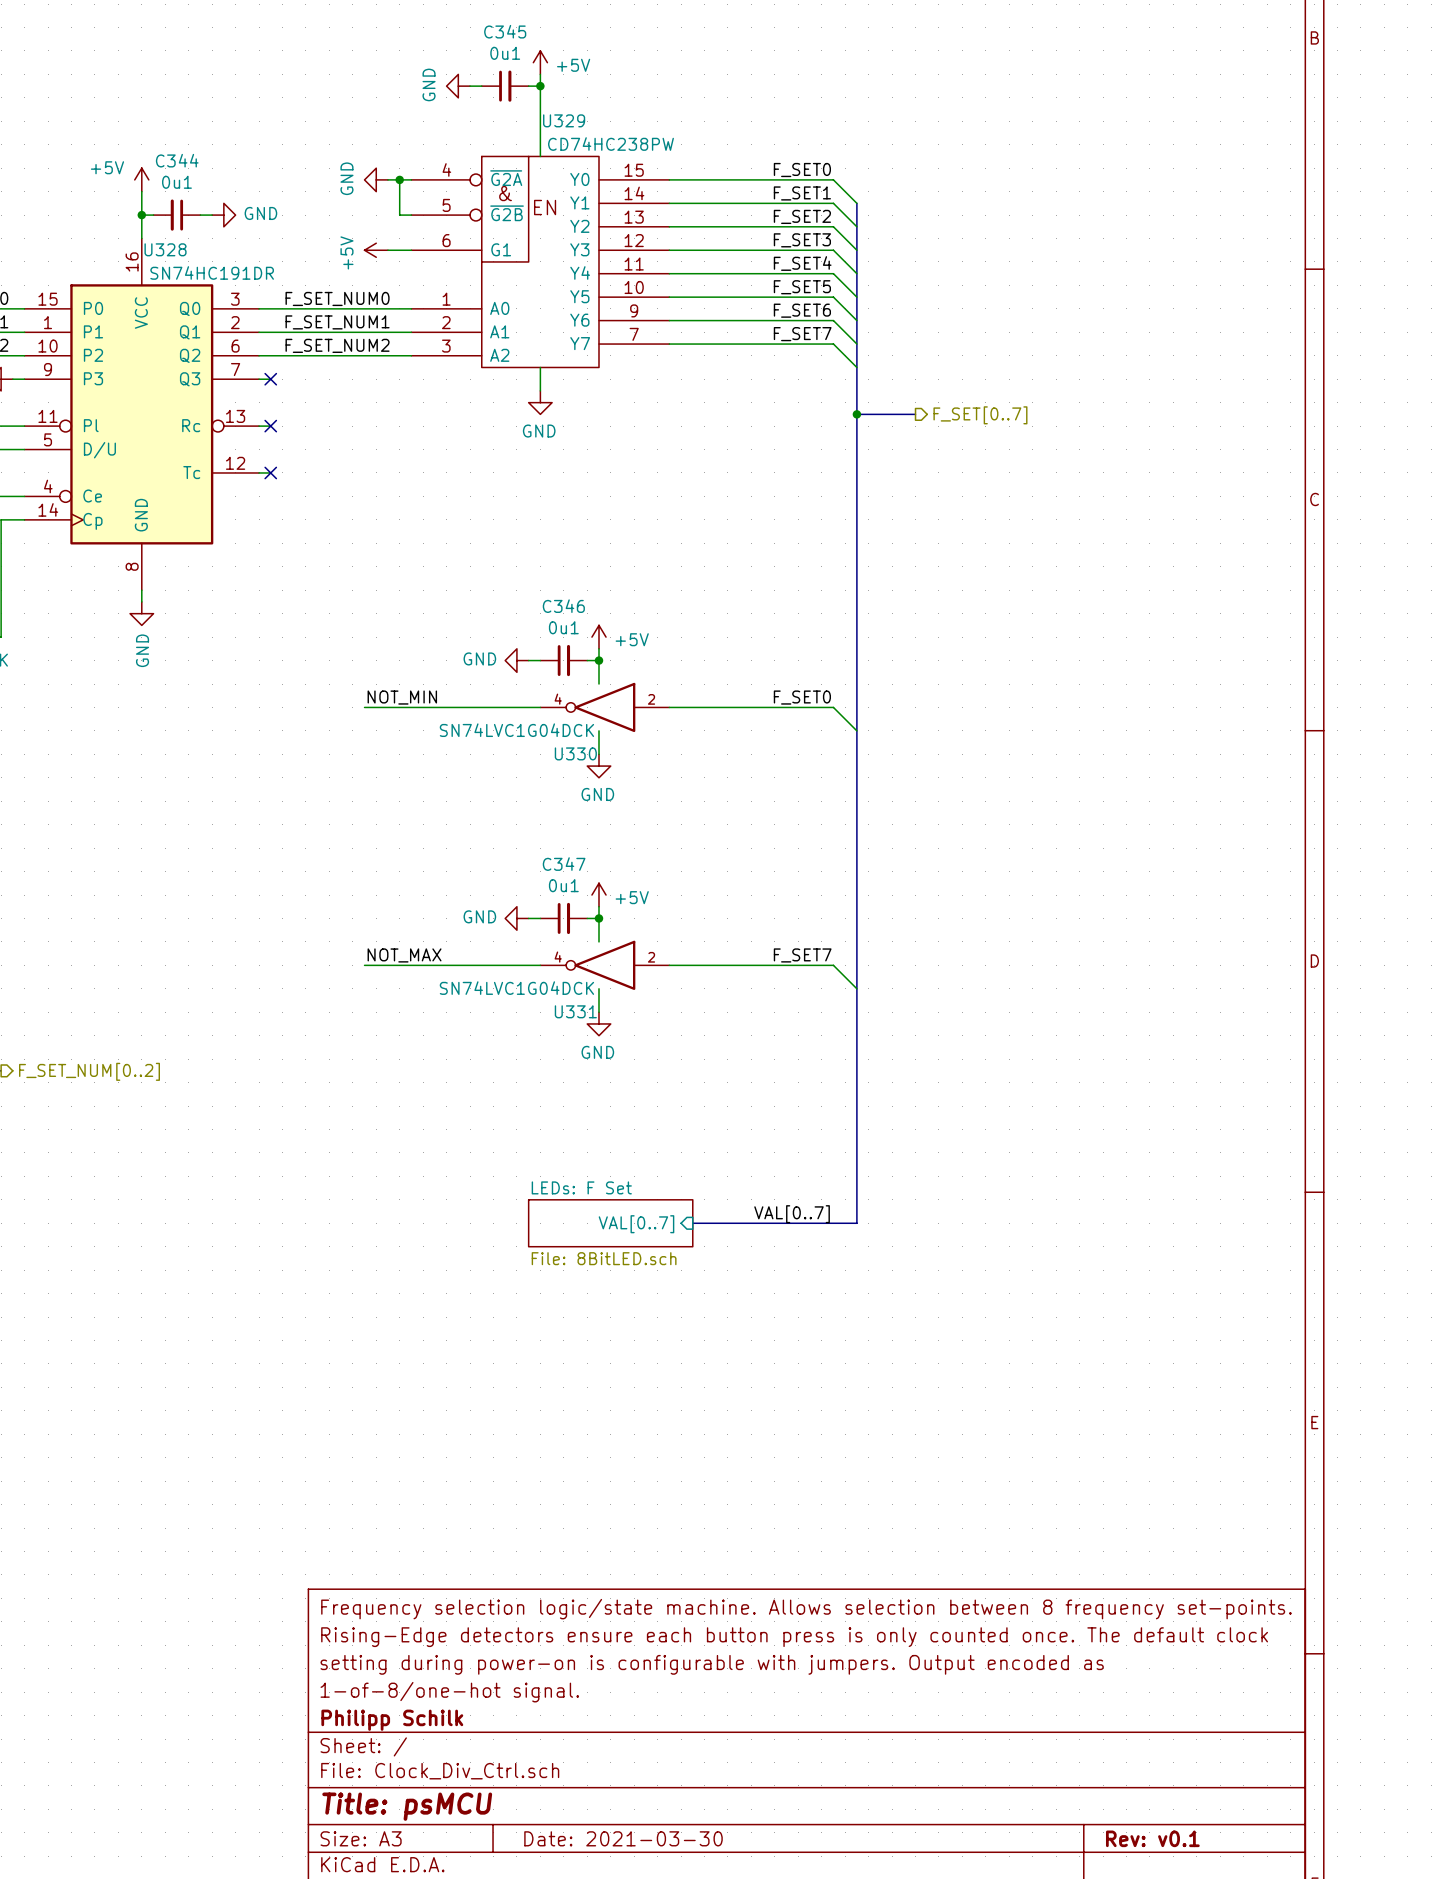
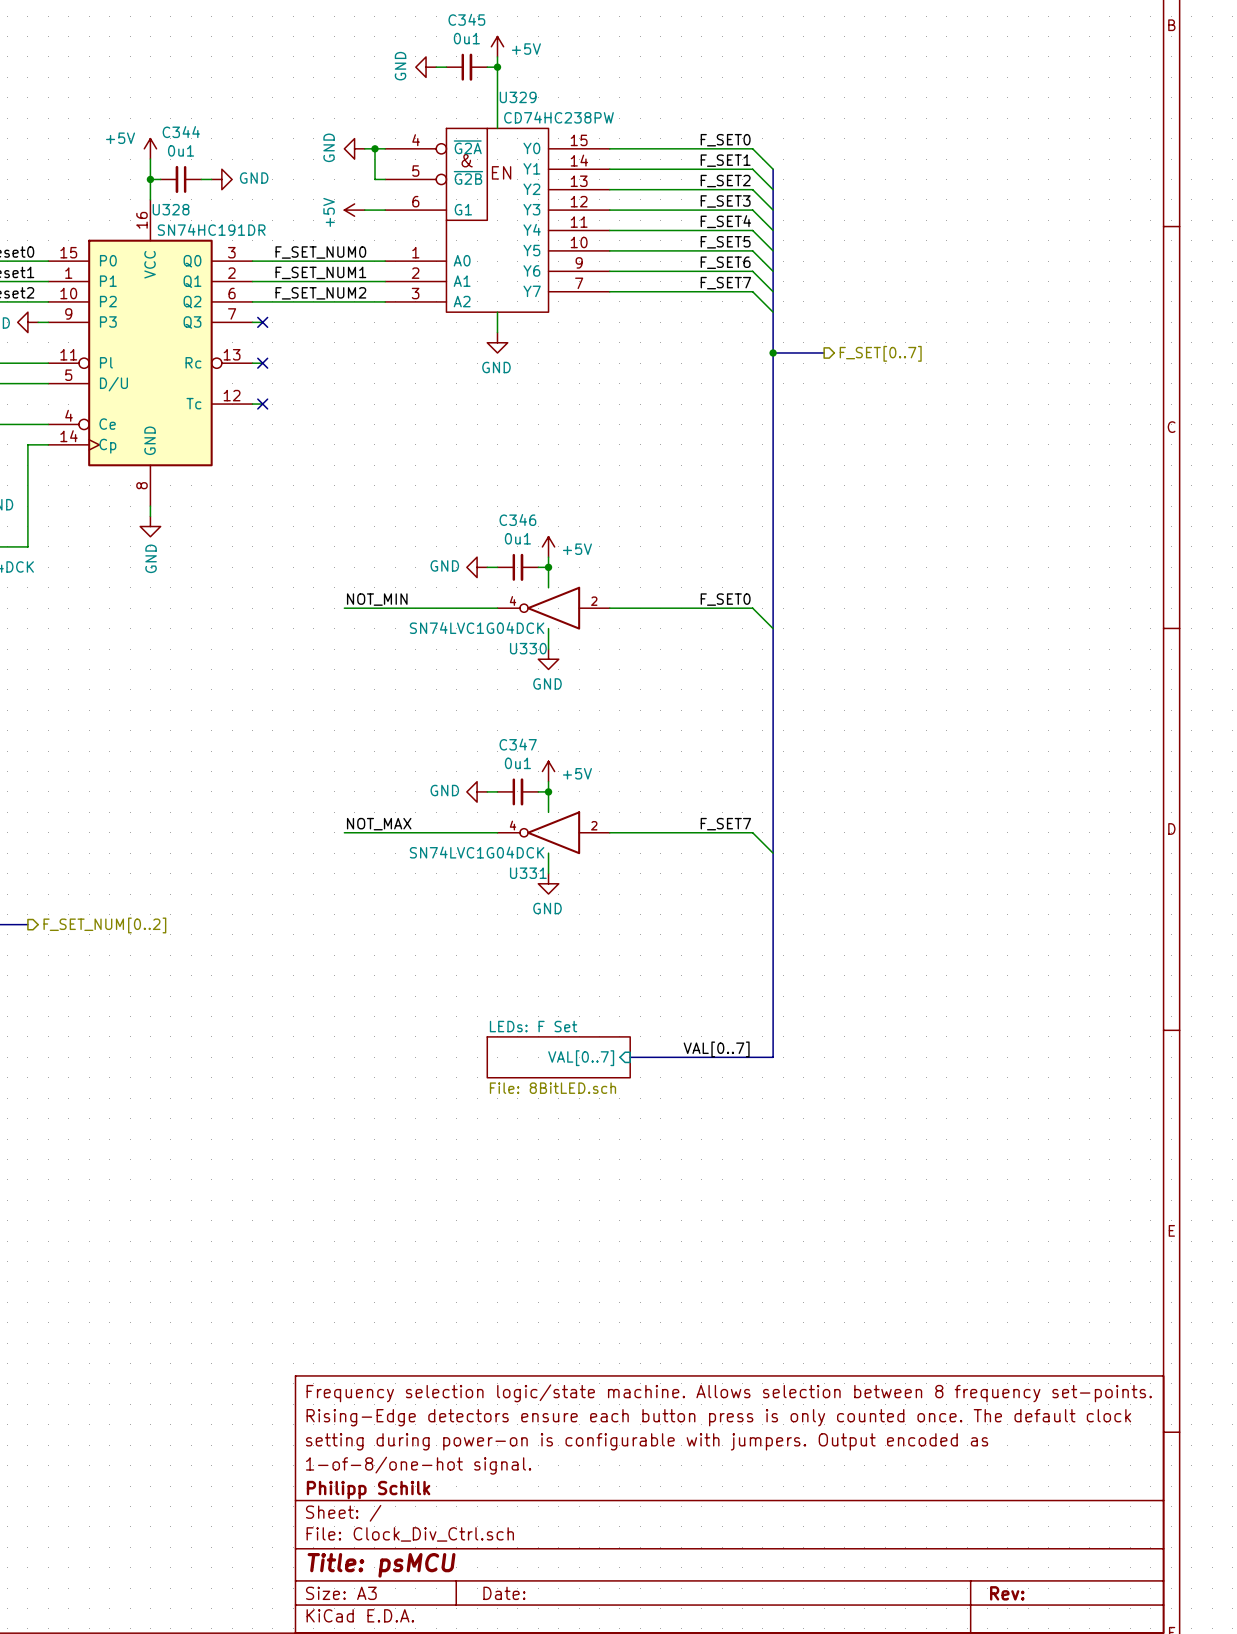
title block: Date: 2021-03-30 (623, 1838) -> Date: (504, 1593)
title block: Rev: v0.1 (1152, 1838) -> Rev: (1007, 1593)

